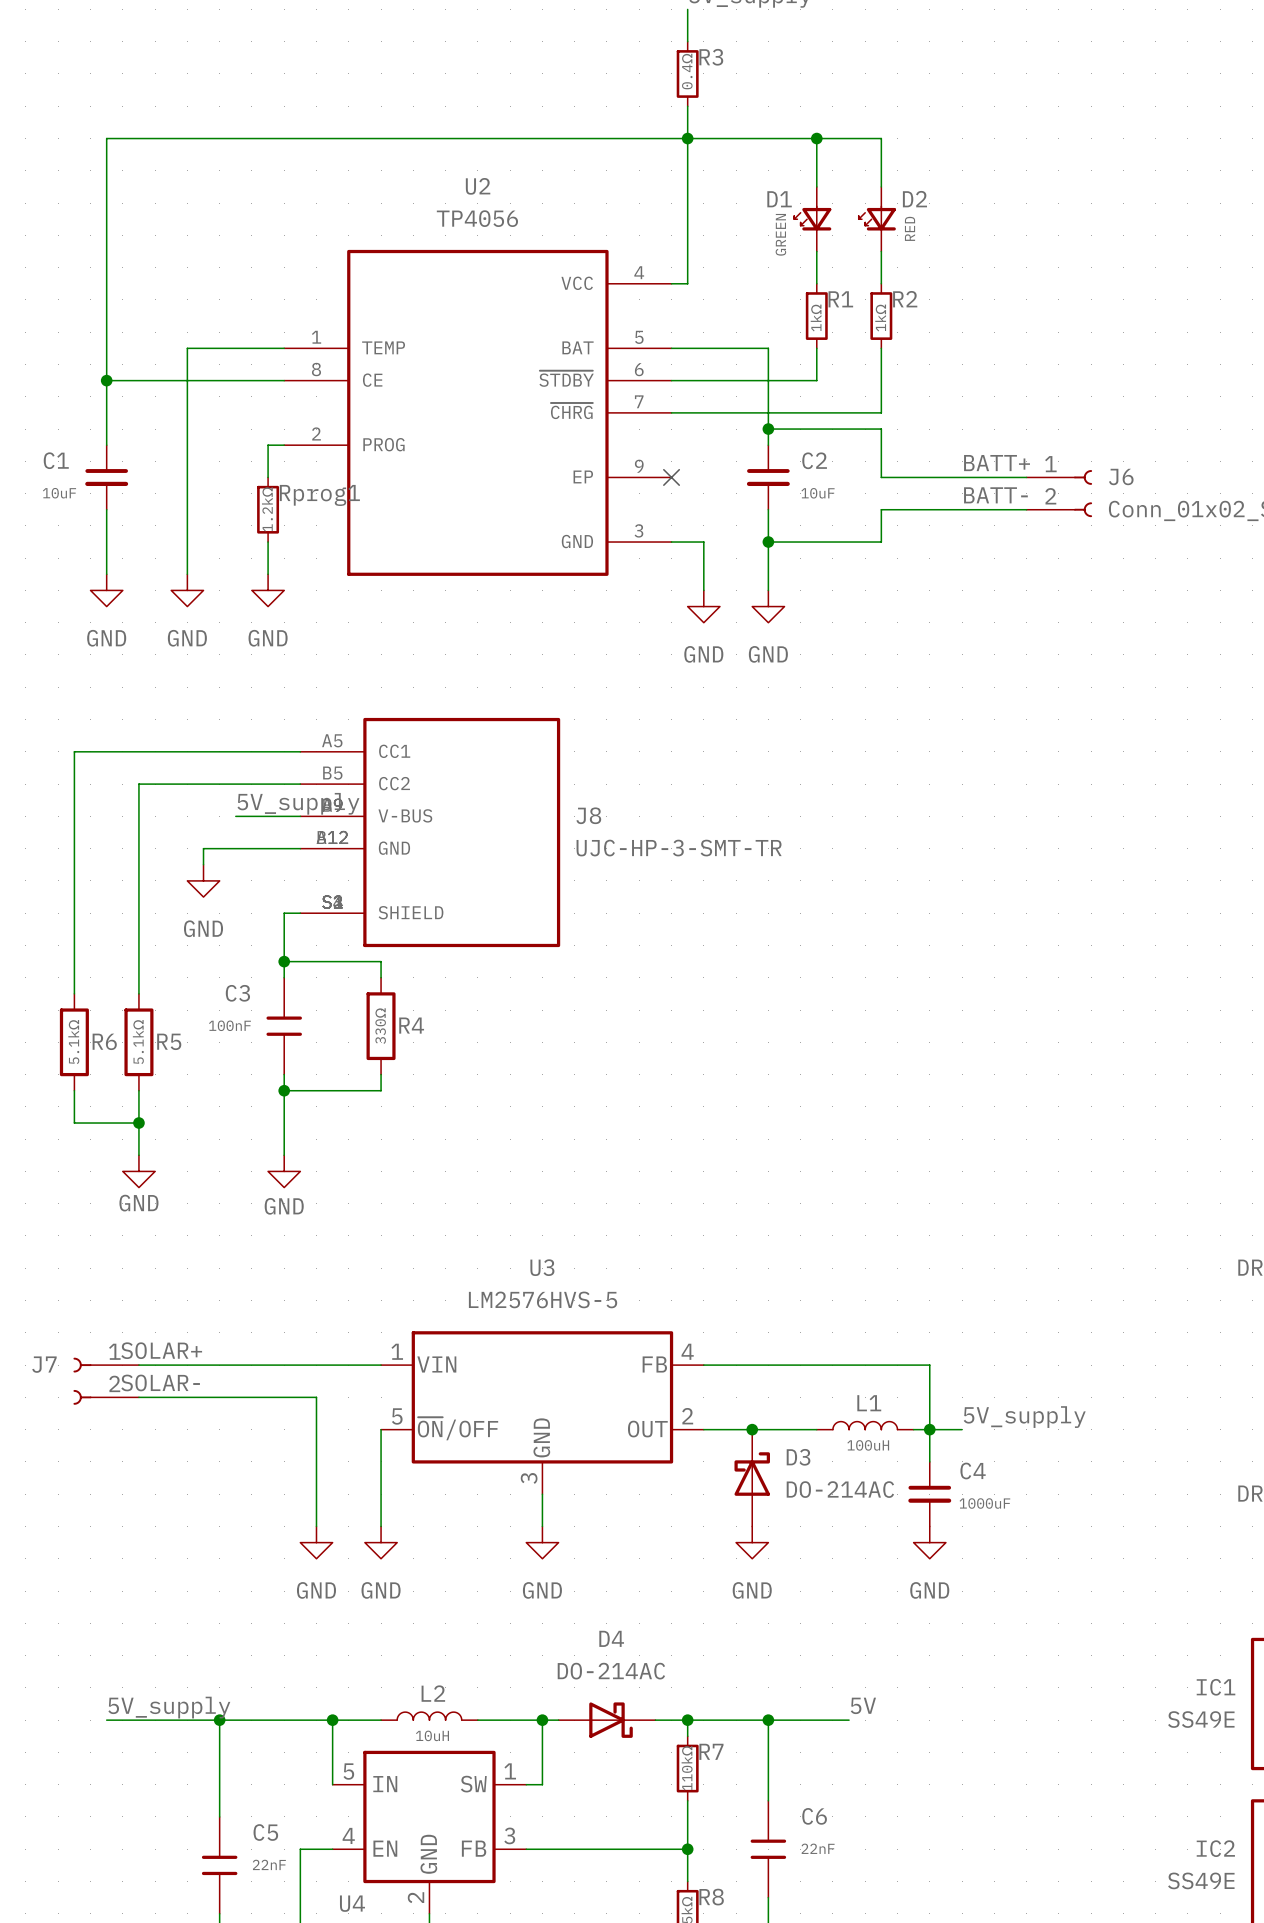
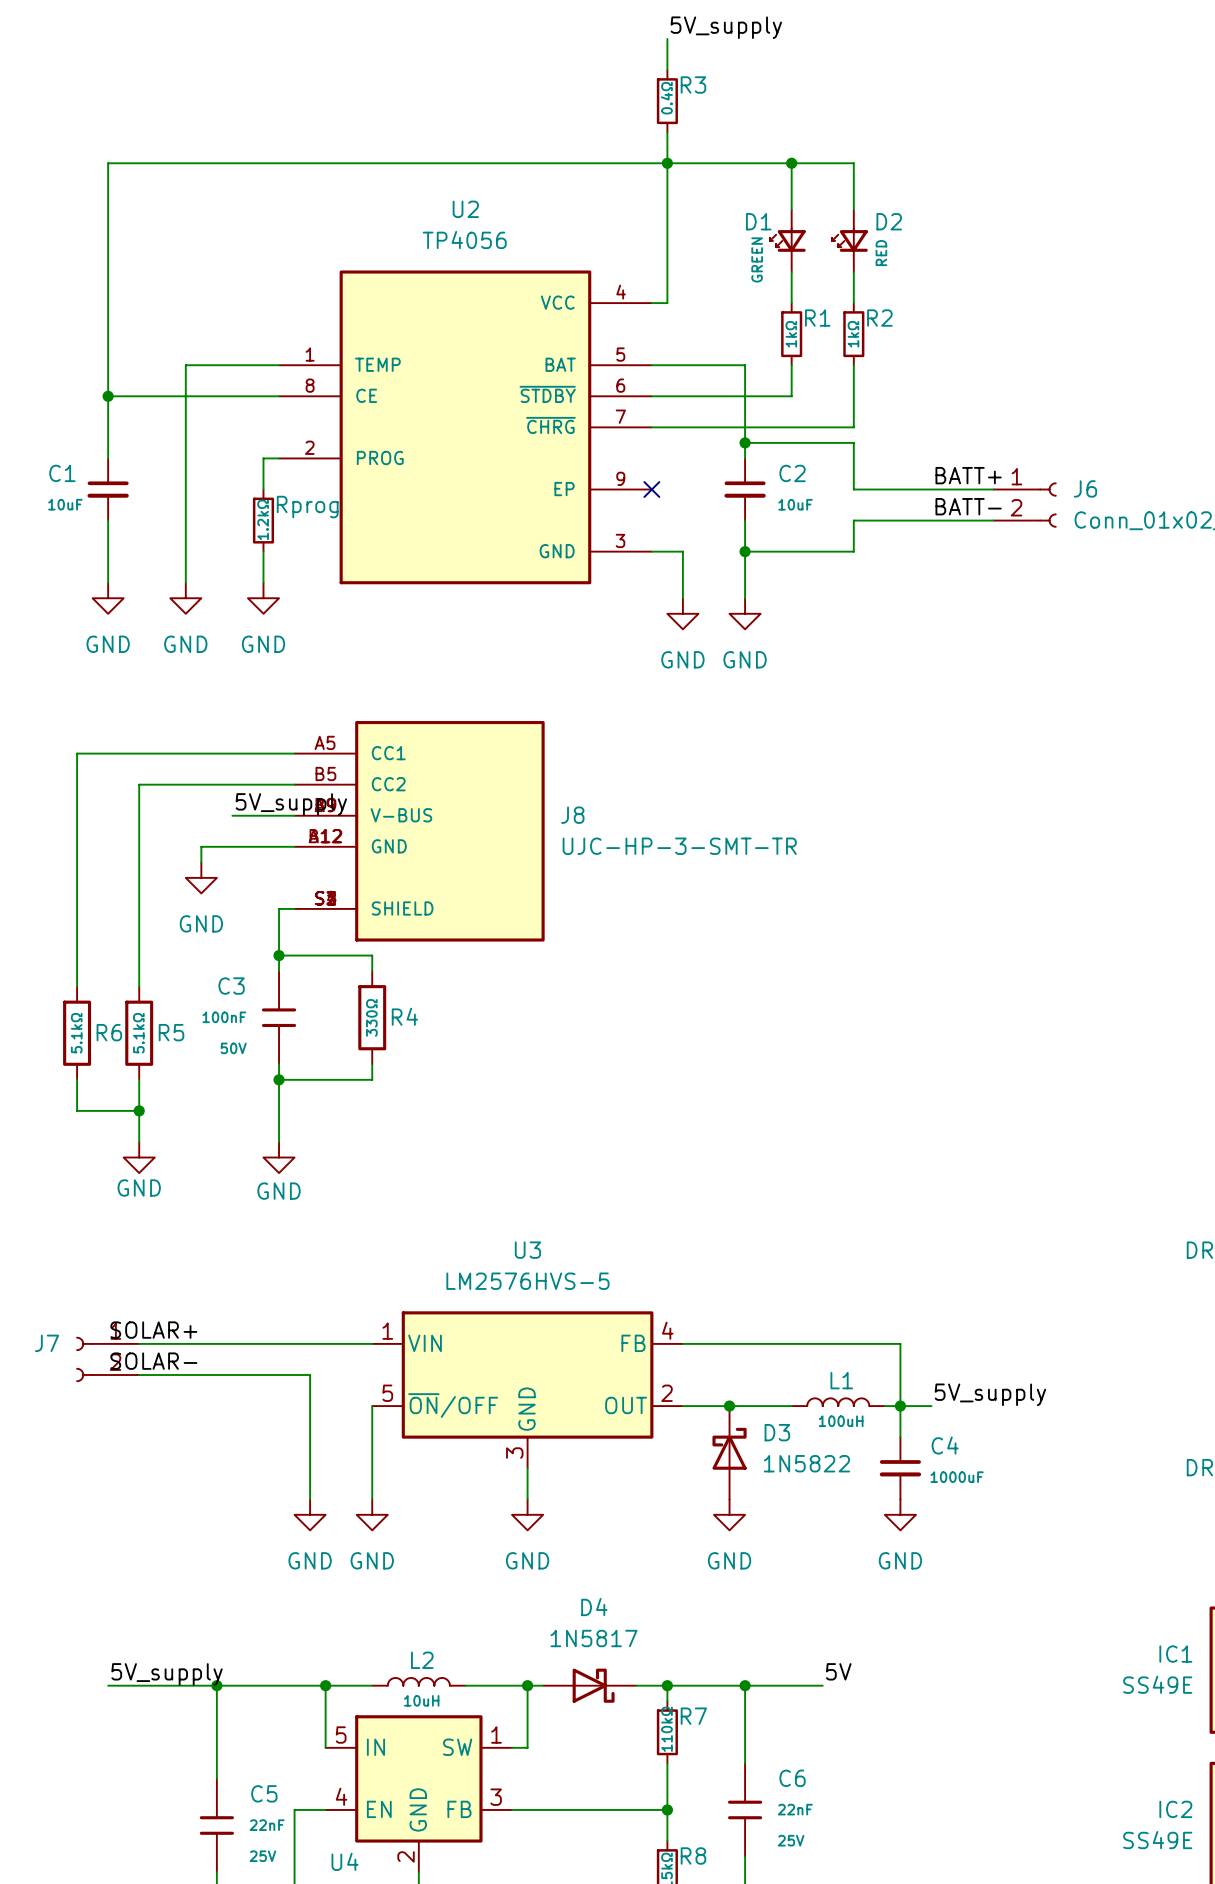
Rprog1 name: Rprog1 (319, 495) -> Rprog (307, 507)
C3 text: none -> 50V (233, 1048)
D3 value: DO-214AC (840, 1489) -> 1N5822 (806, 1463)
D4 value: DO-214AC (611, 1671) -> 1N5817 (593, 1638)
C6 text: none -> 25V (791, 1840)
C5 text: none -> 25V (262, 1856)

